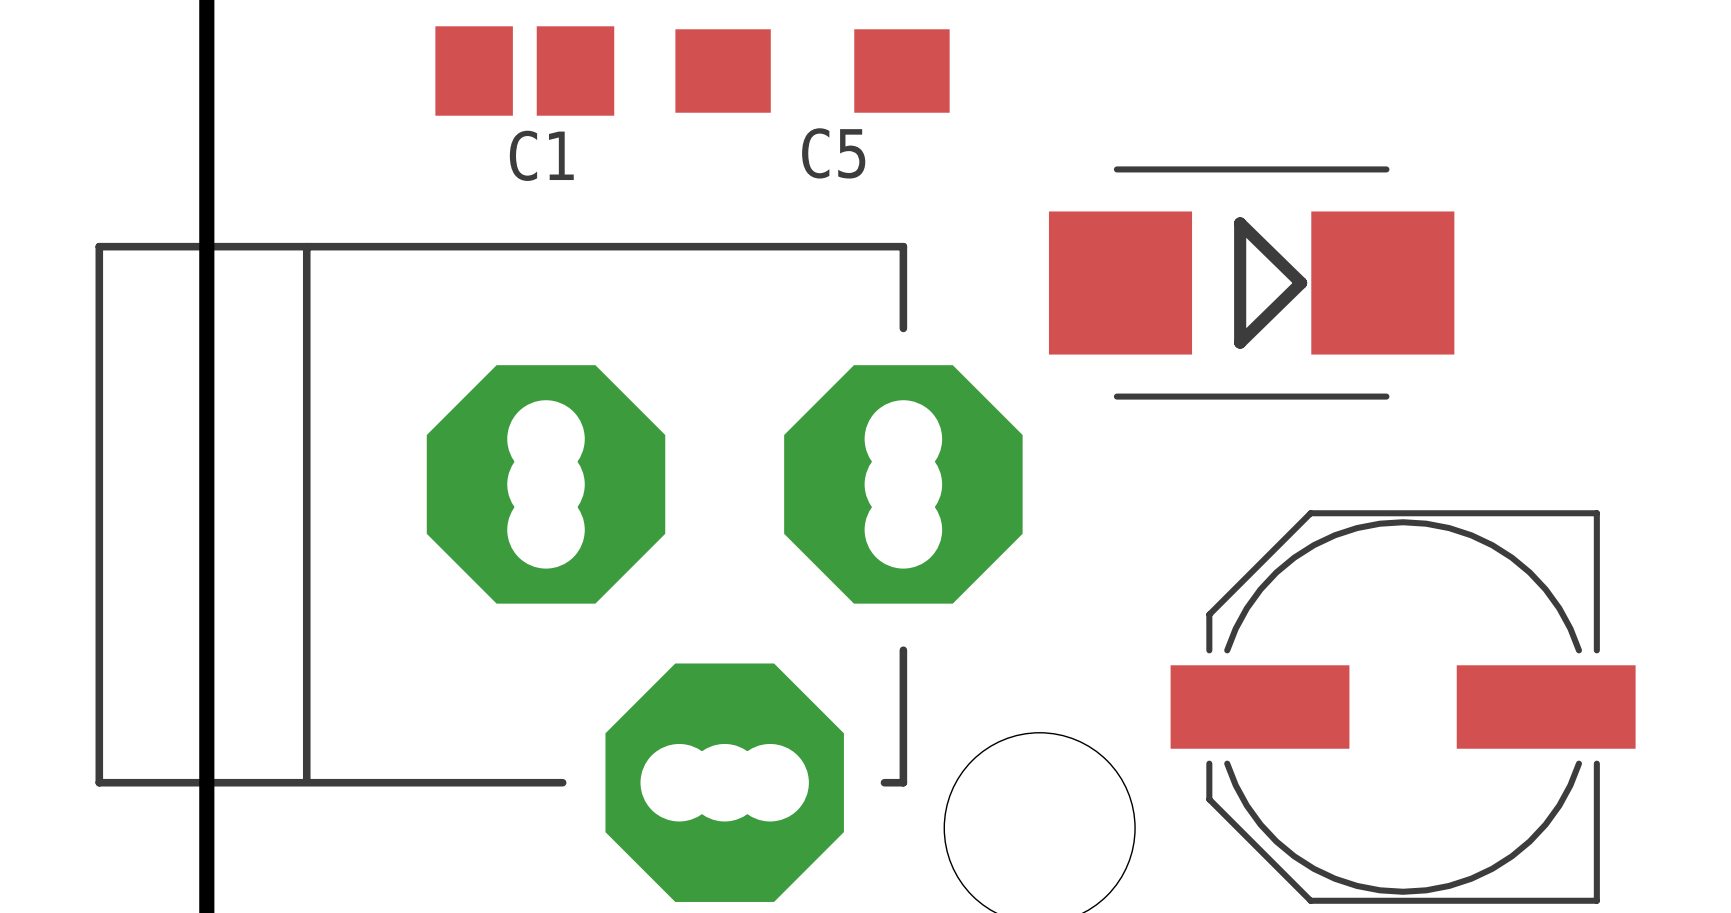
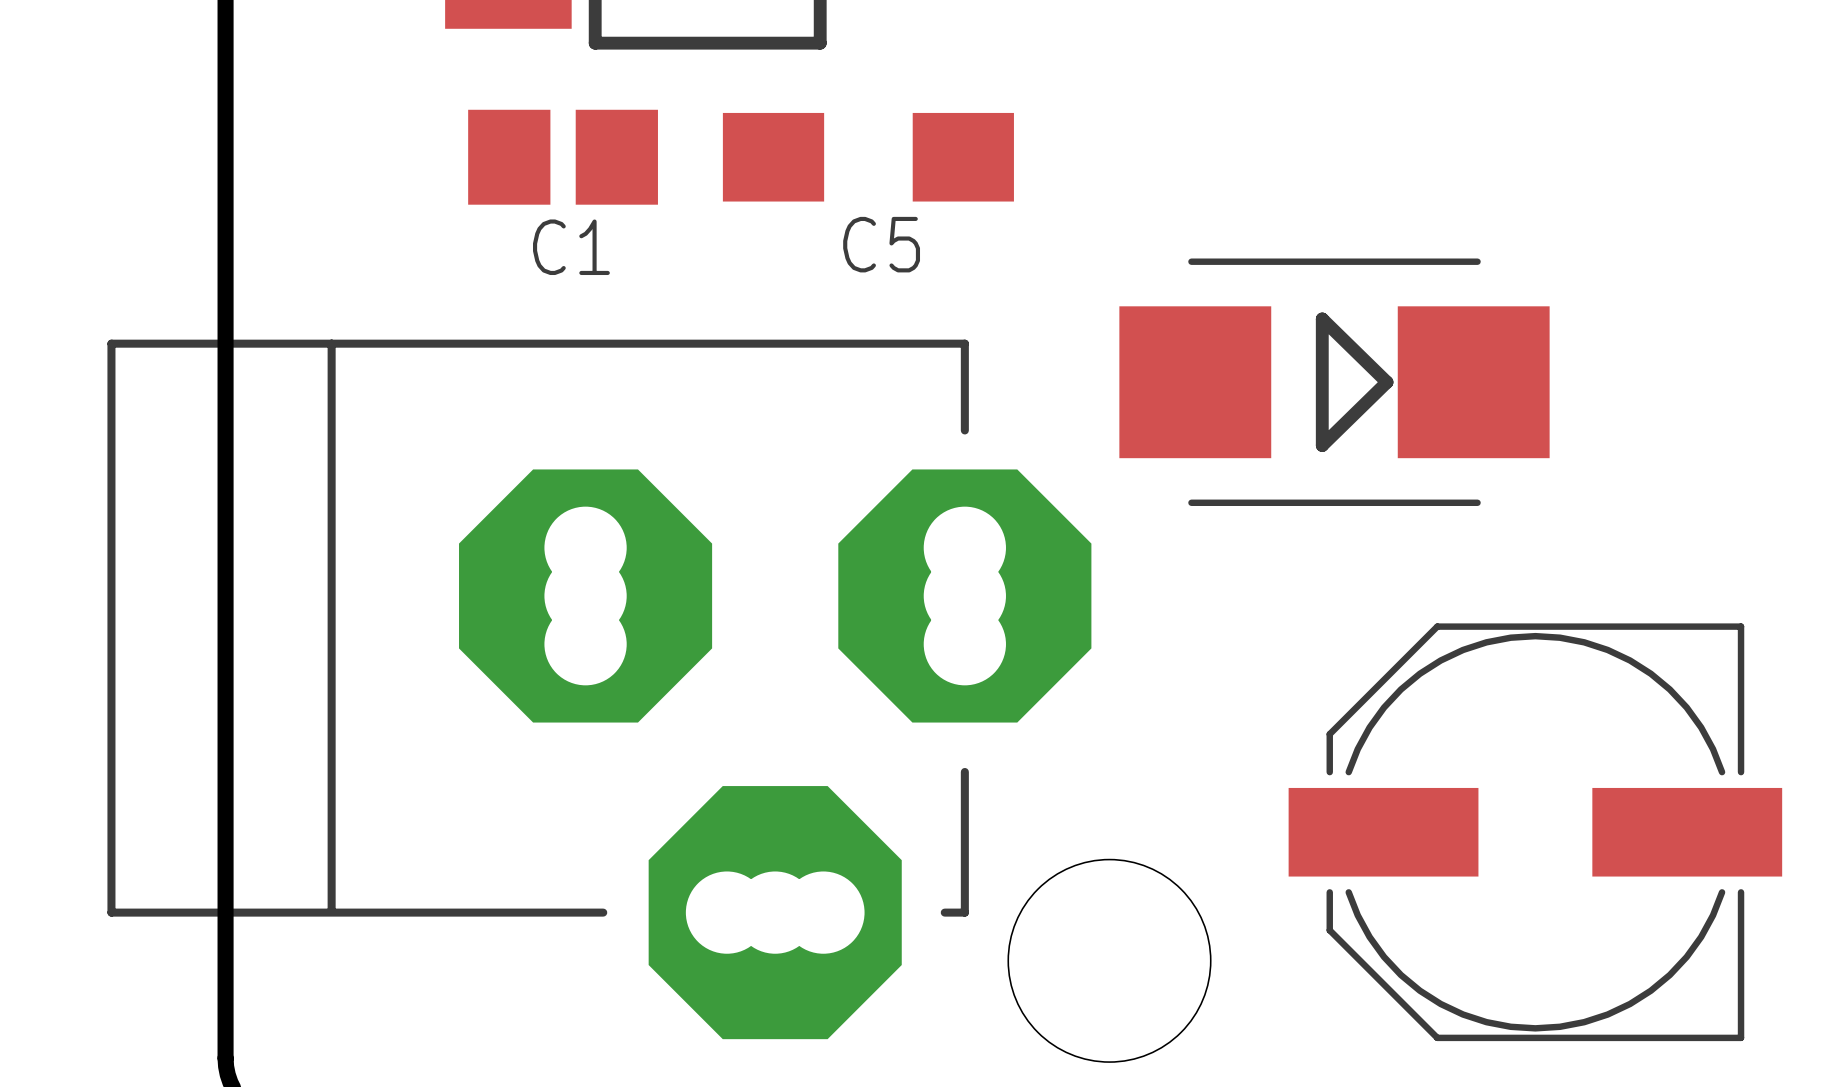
part position: (1403, 707) -> (1535, 832)

